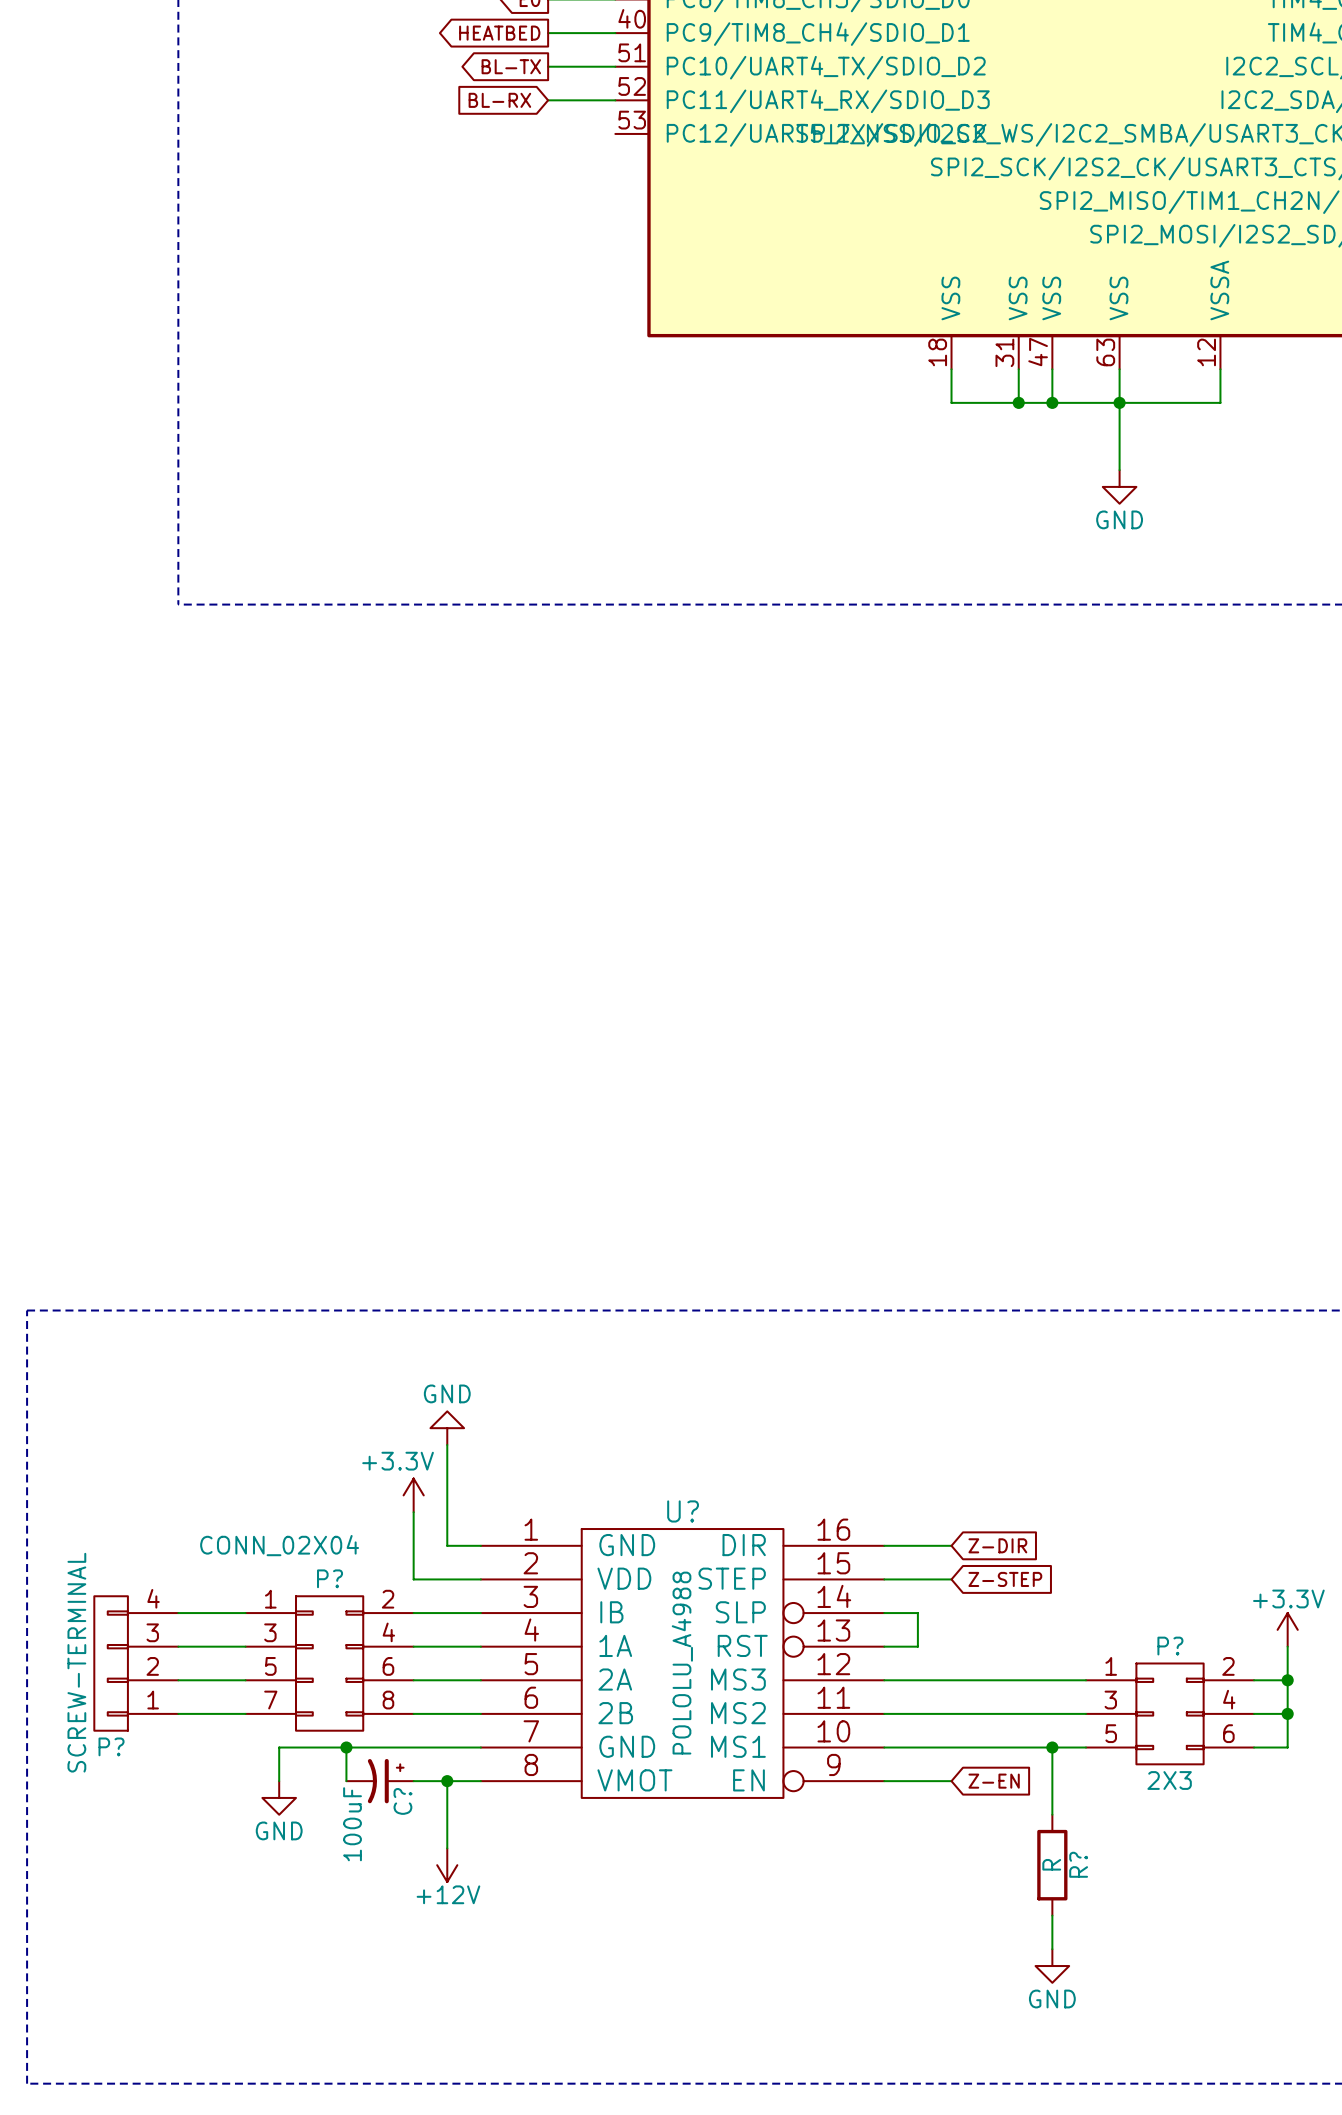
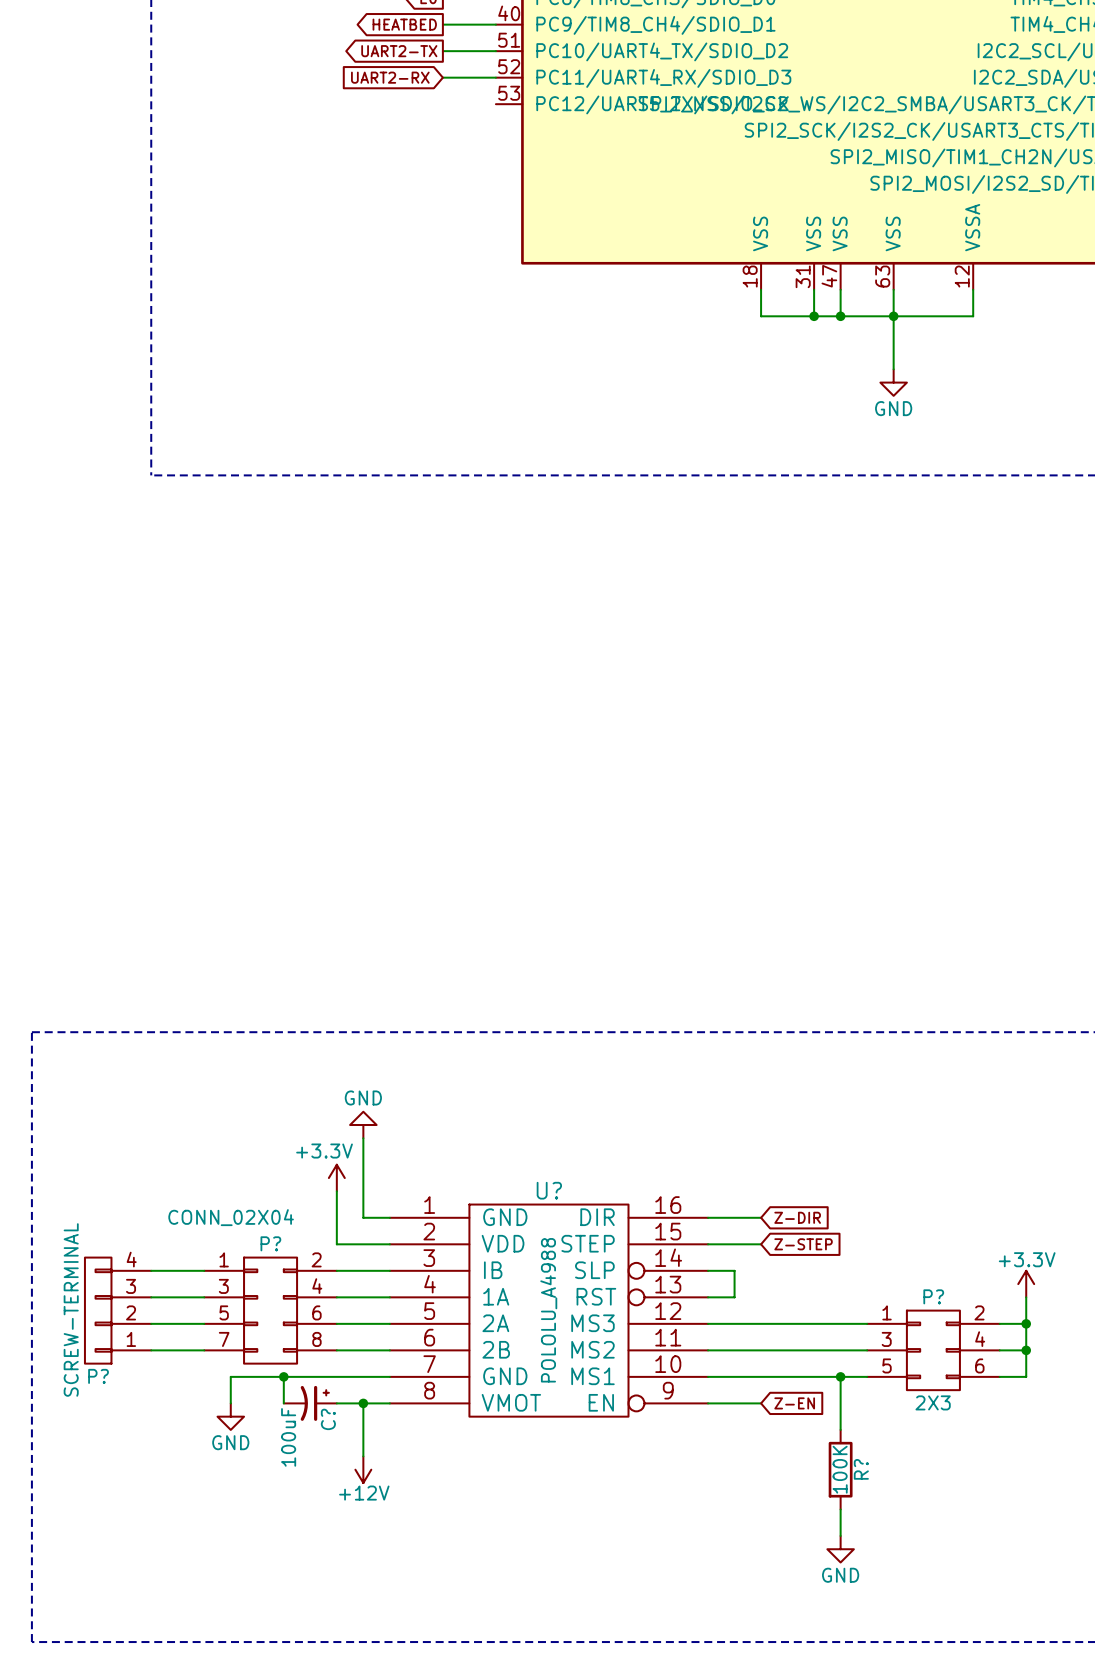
global label: BL-TX (511, 66) -> UART2-TX (399, 51)
global label: BL-RX (499, 100) -> UART2-RX (390, 77)
R? value: R (1051, 1864) -> 100K (840, 1469)

